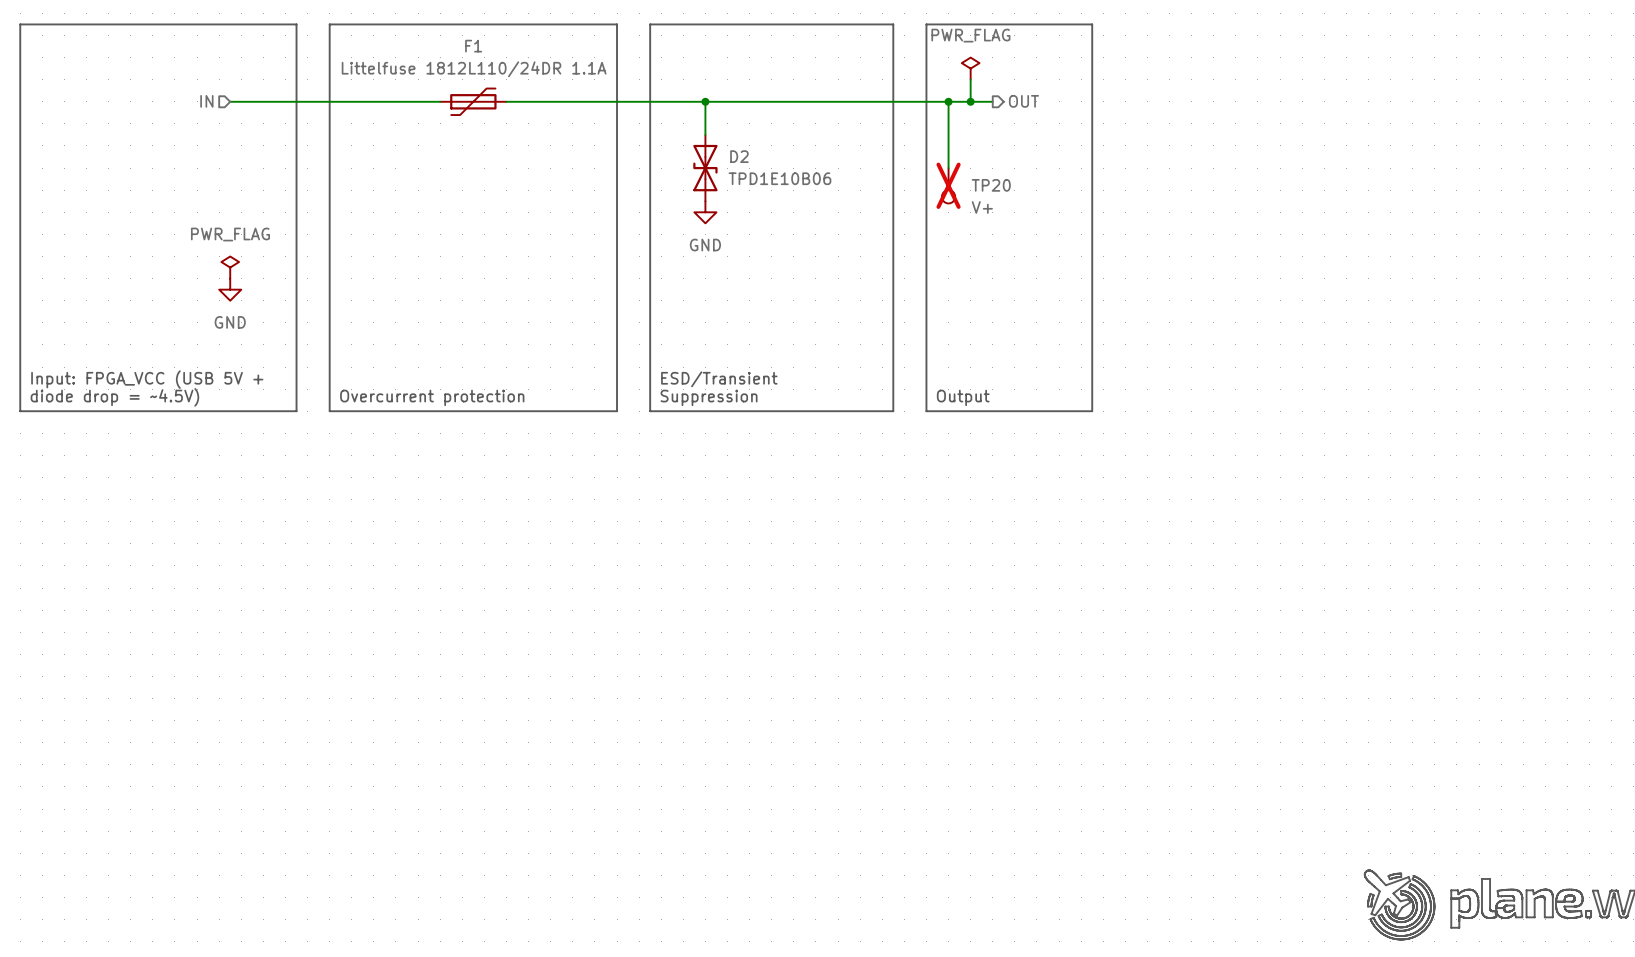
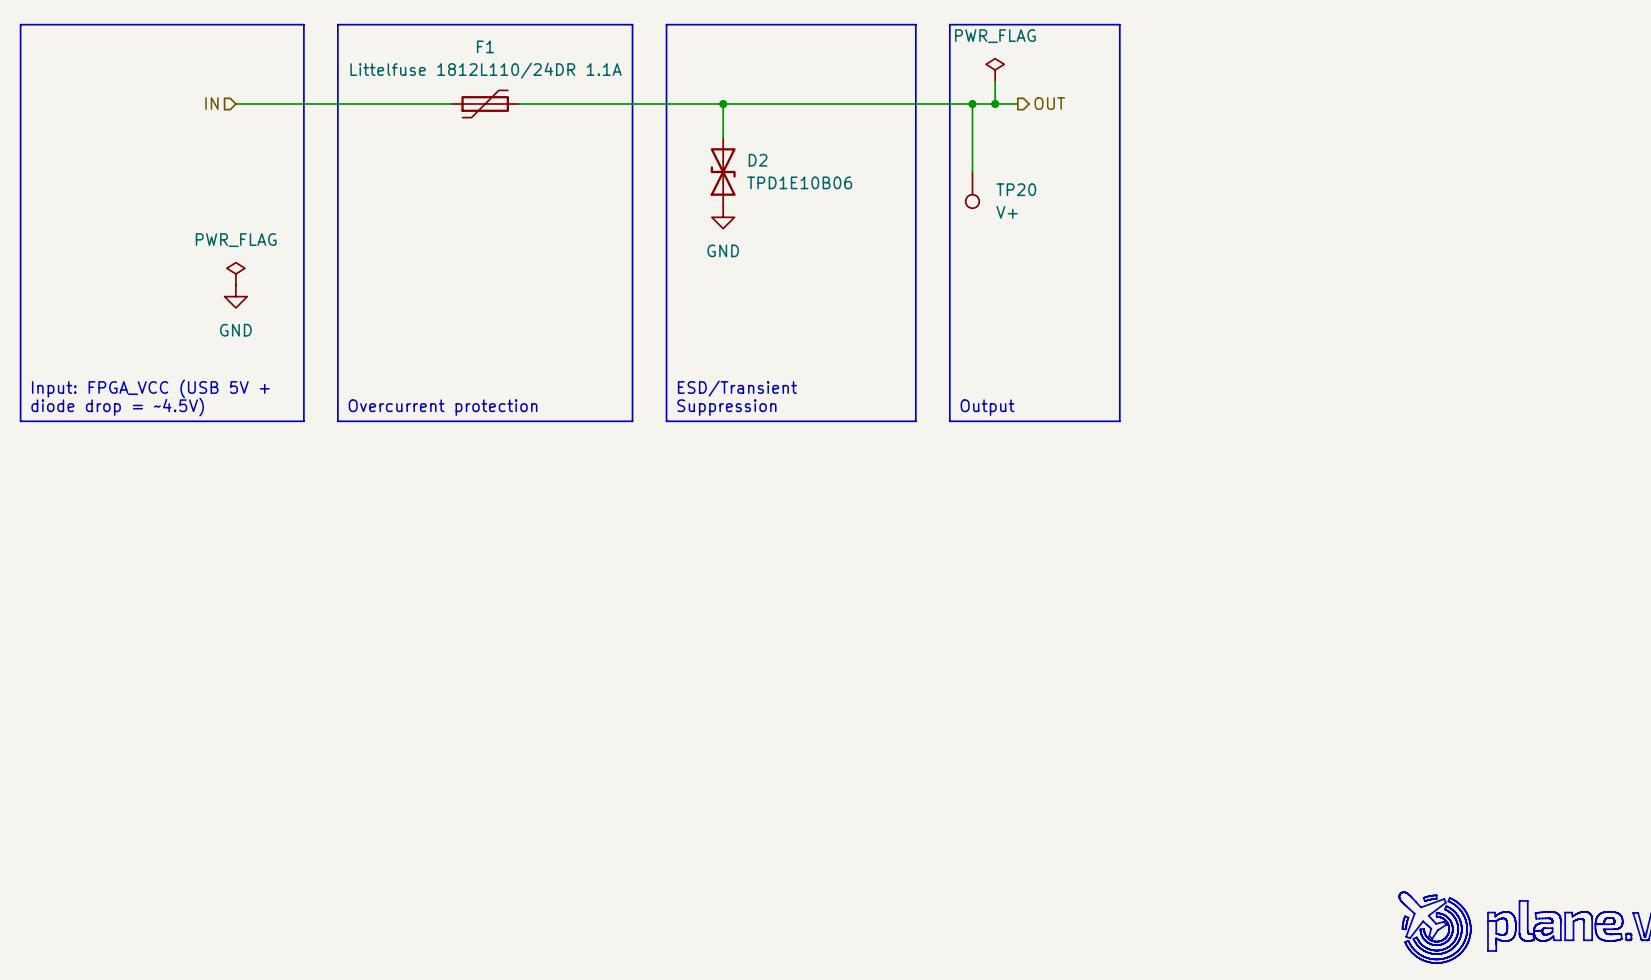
TP20 do-not-place cross: (948, 185) -> none

